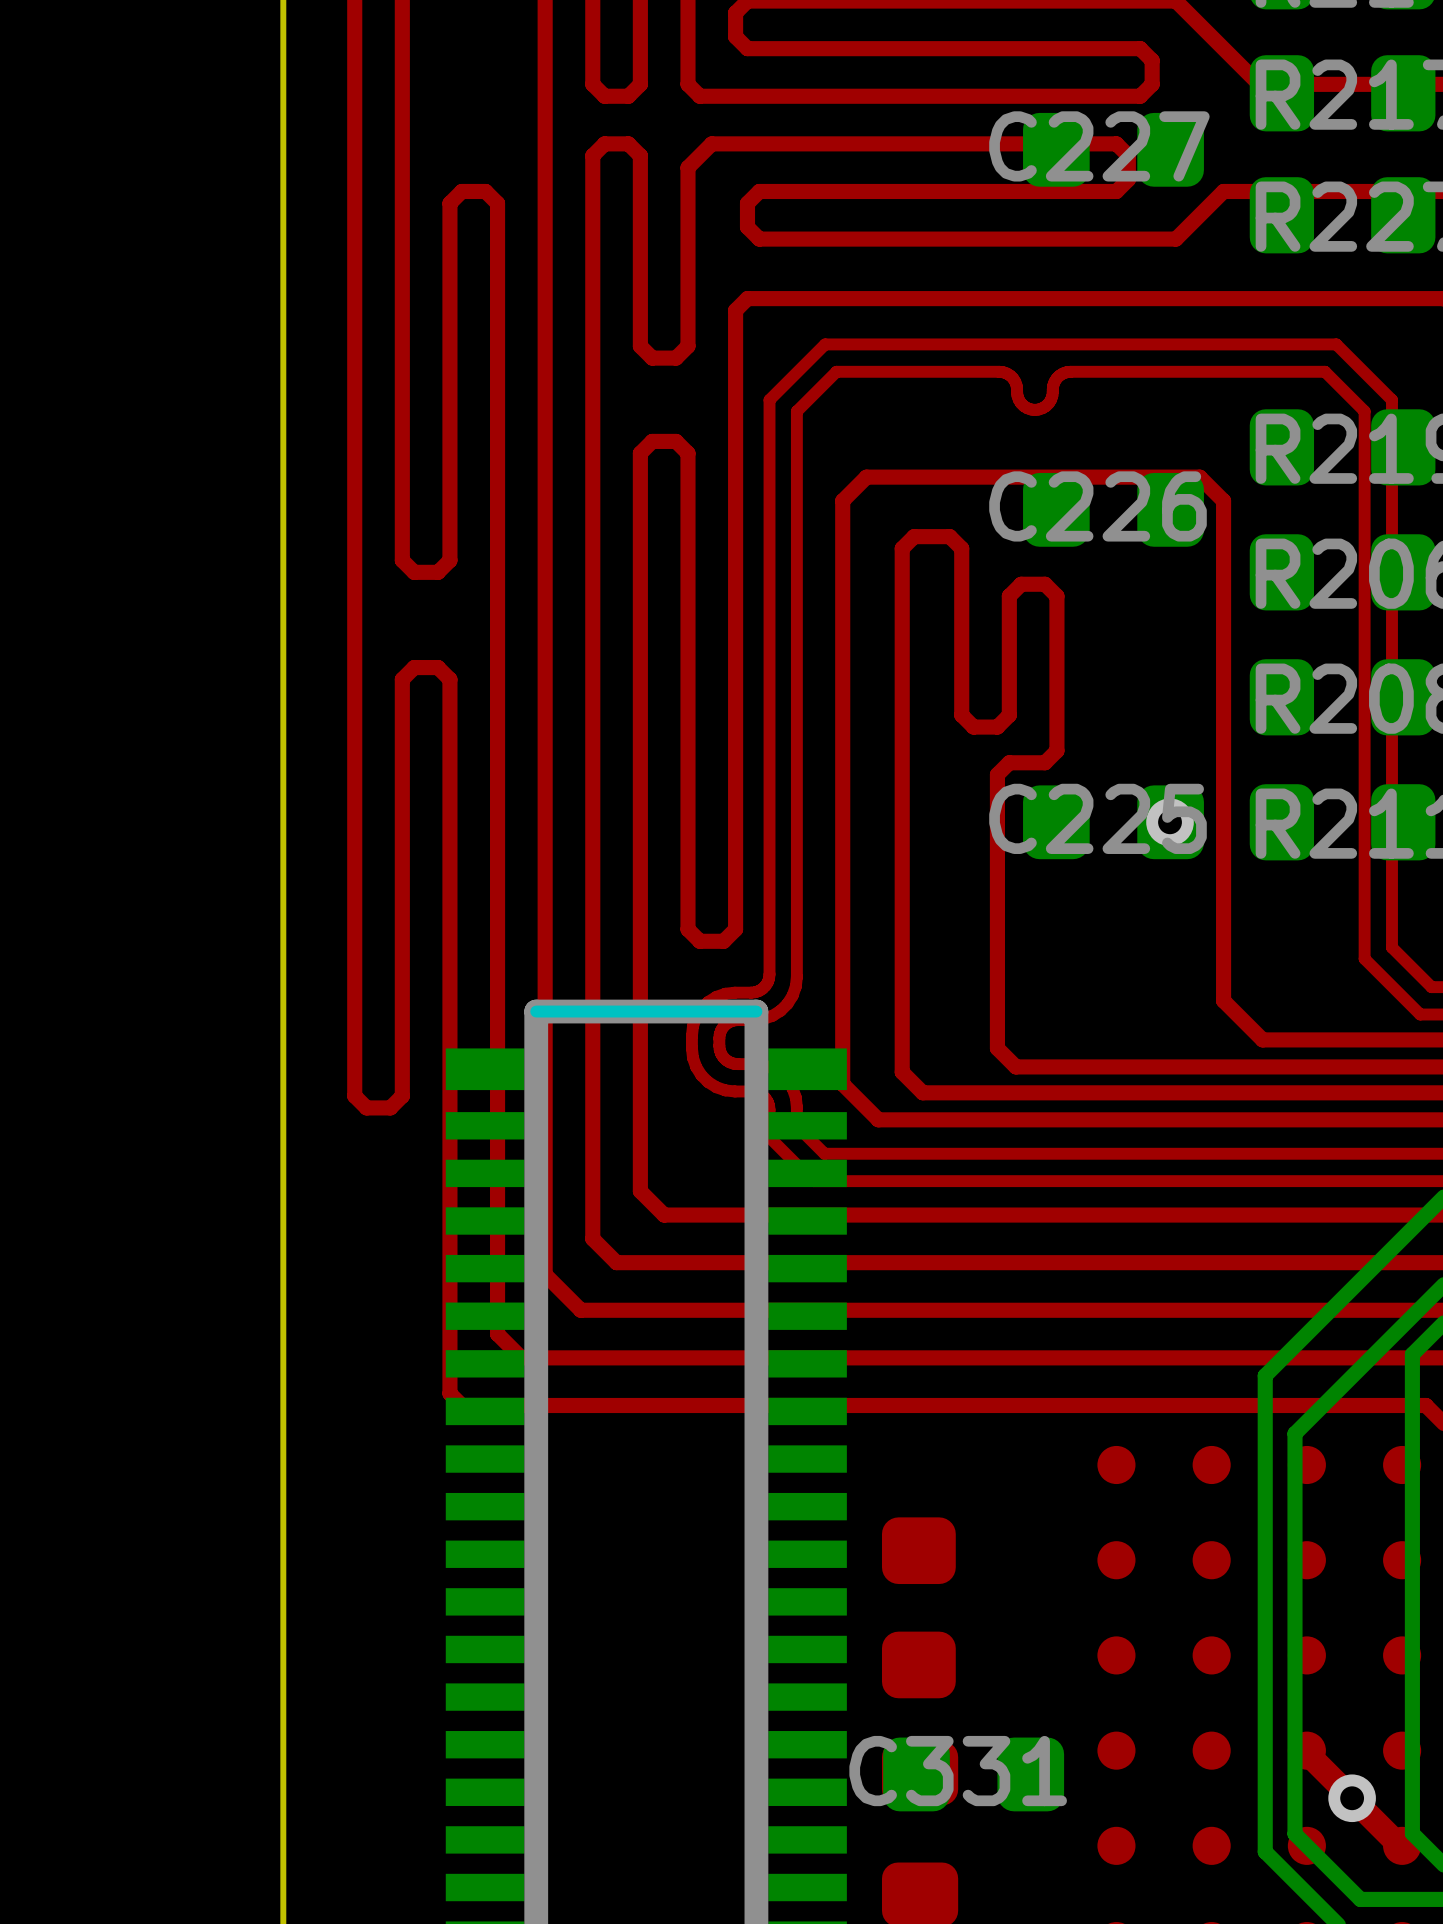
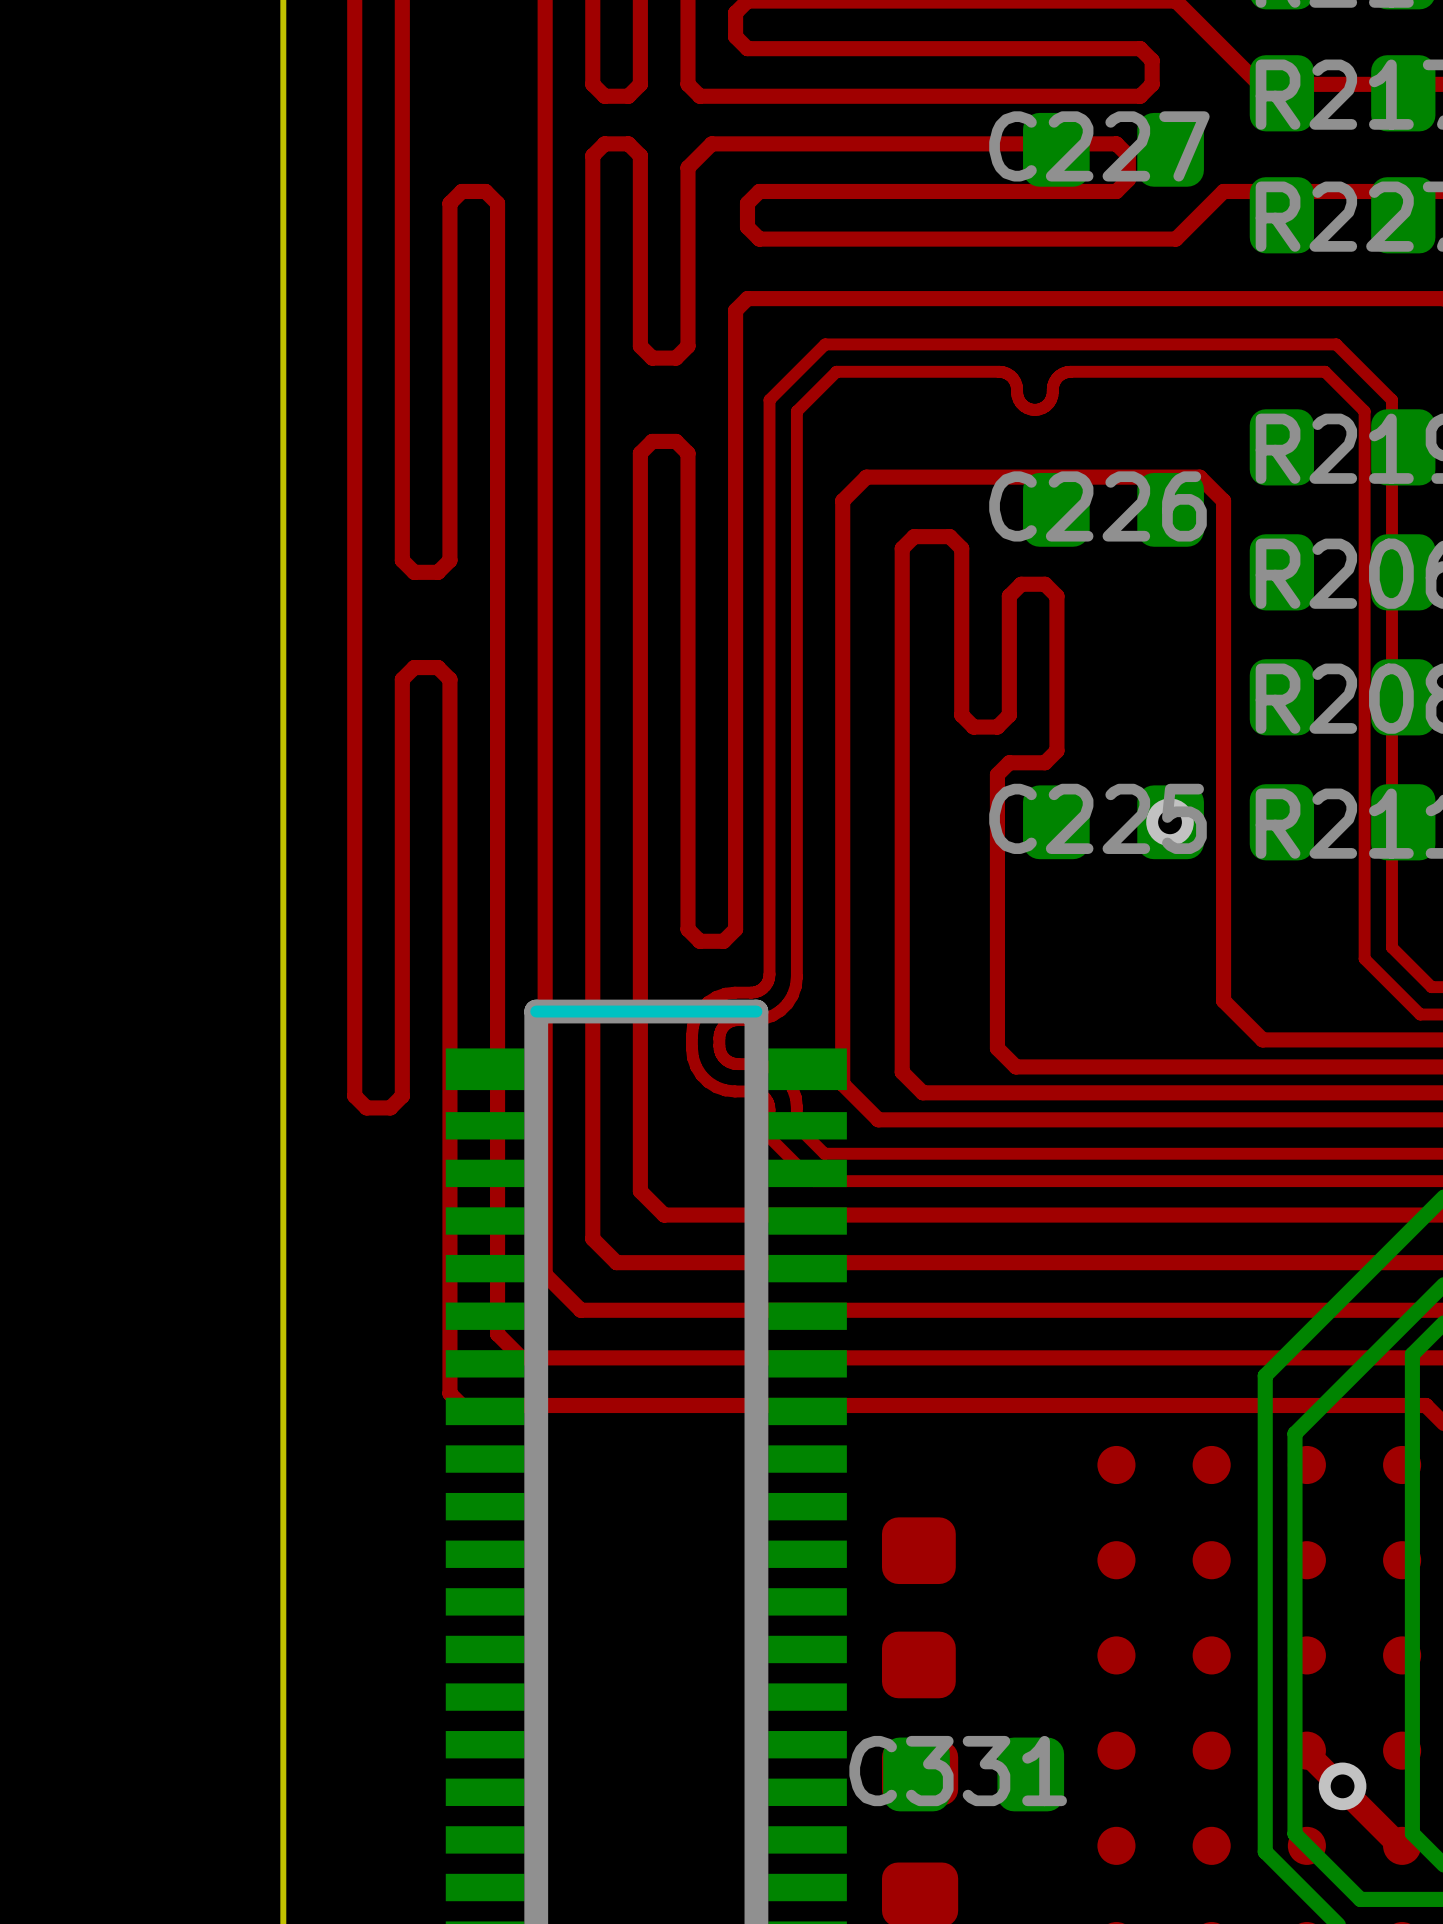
via position: (1352, 1798) -> (1342, 1786)

